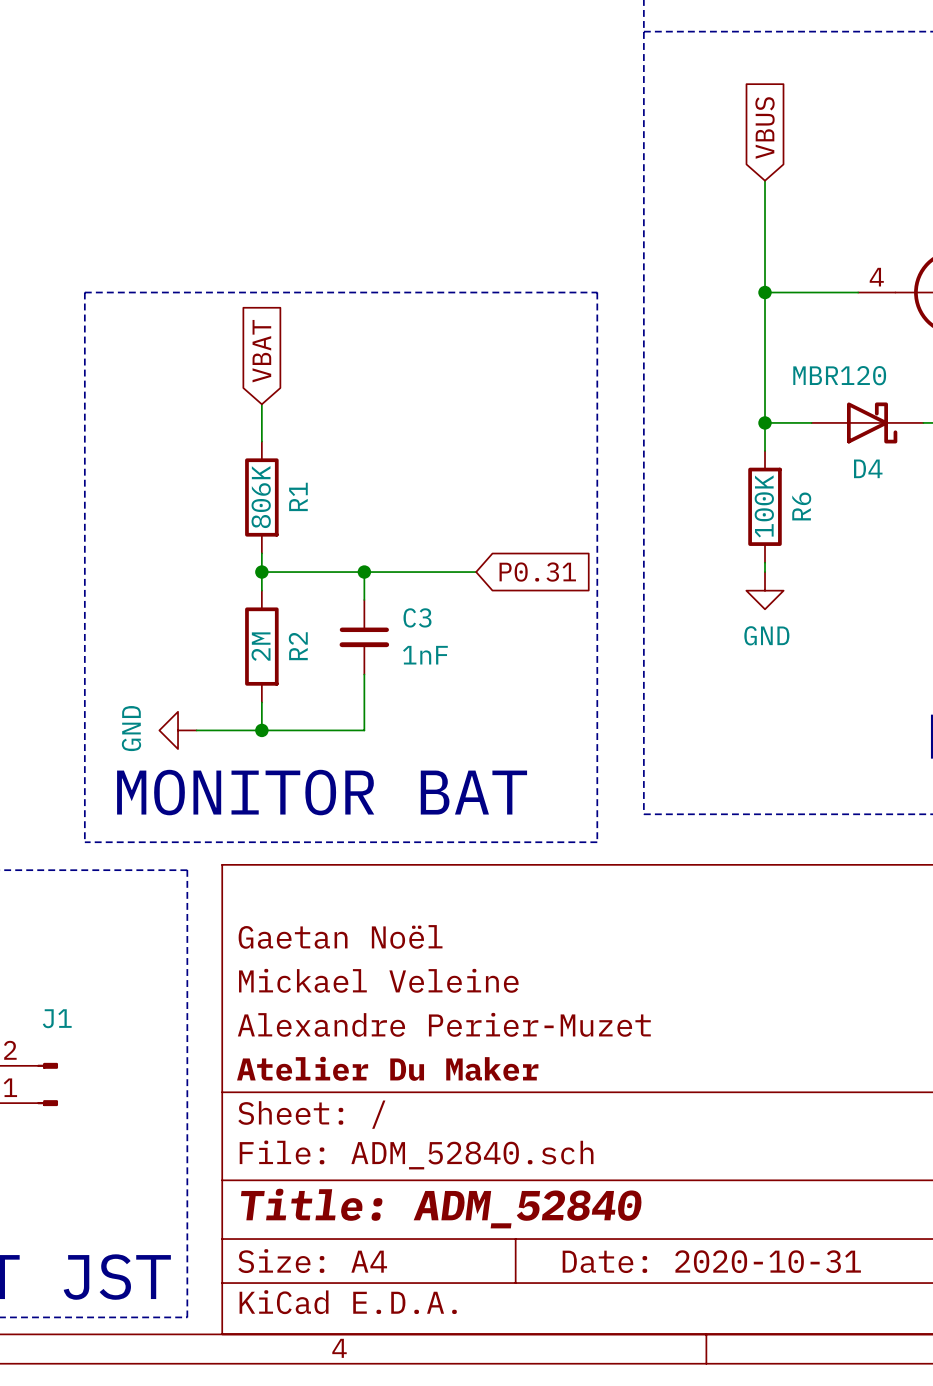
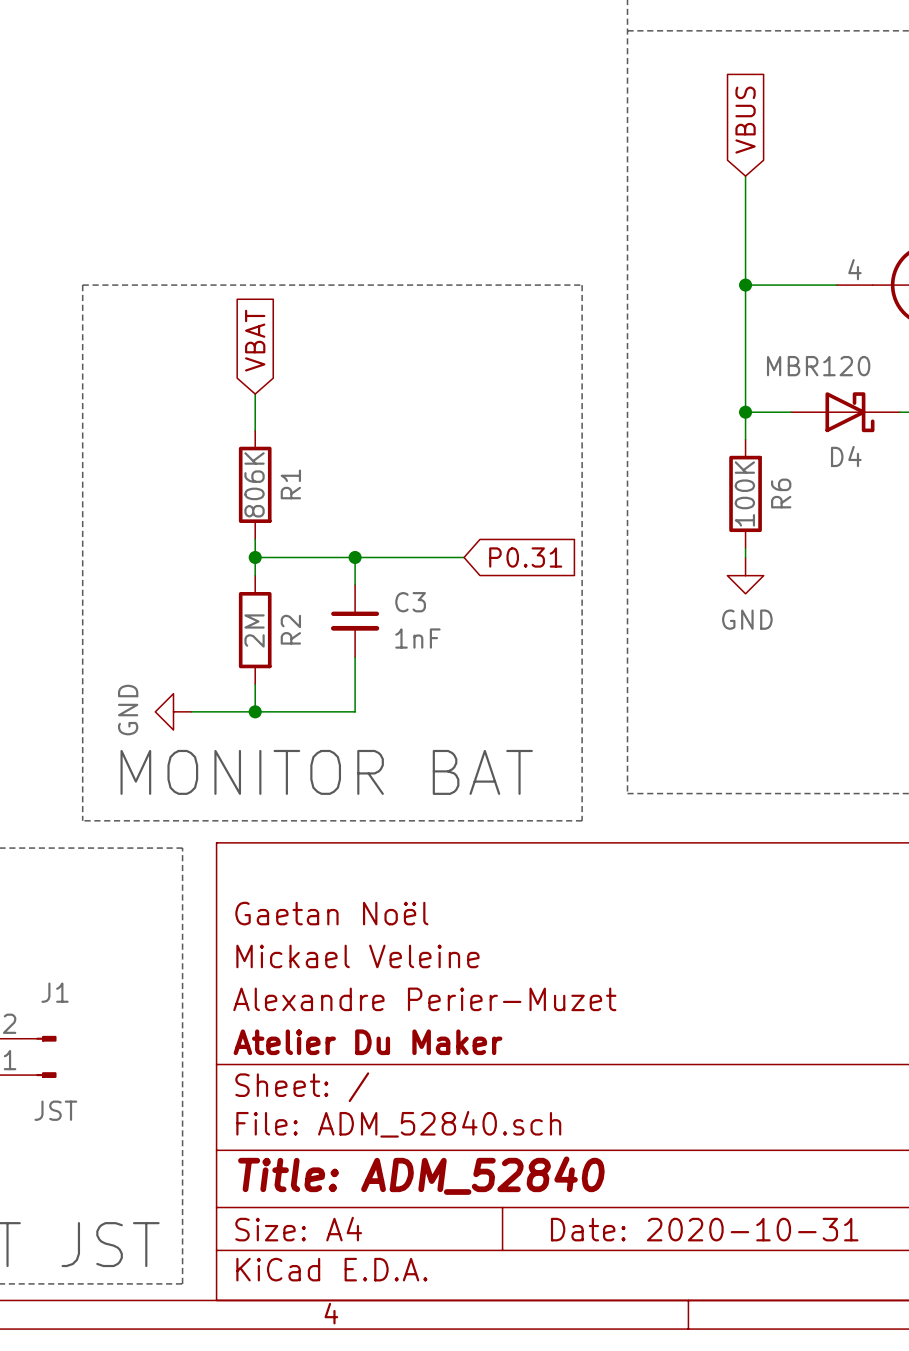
J1 value: none -> JST (55, 1110)

